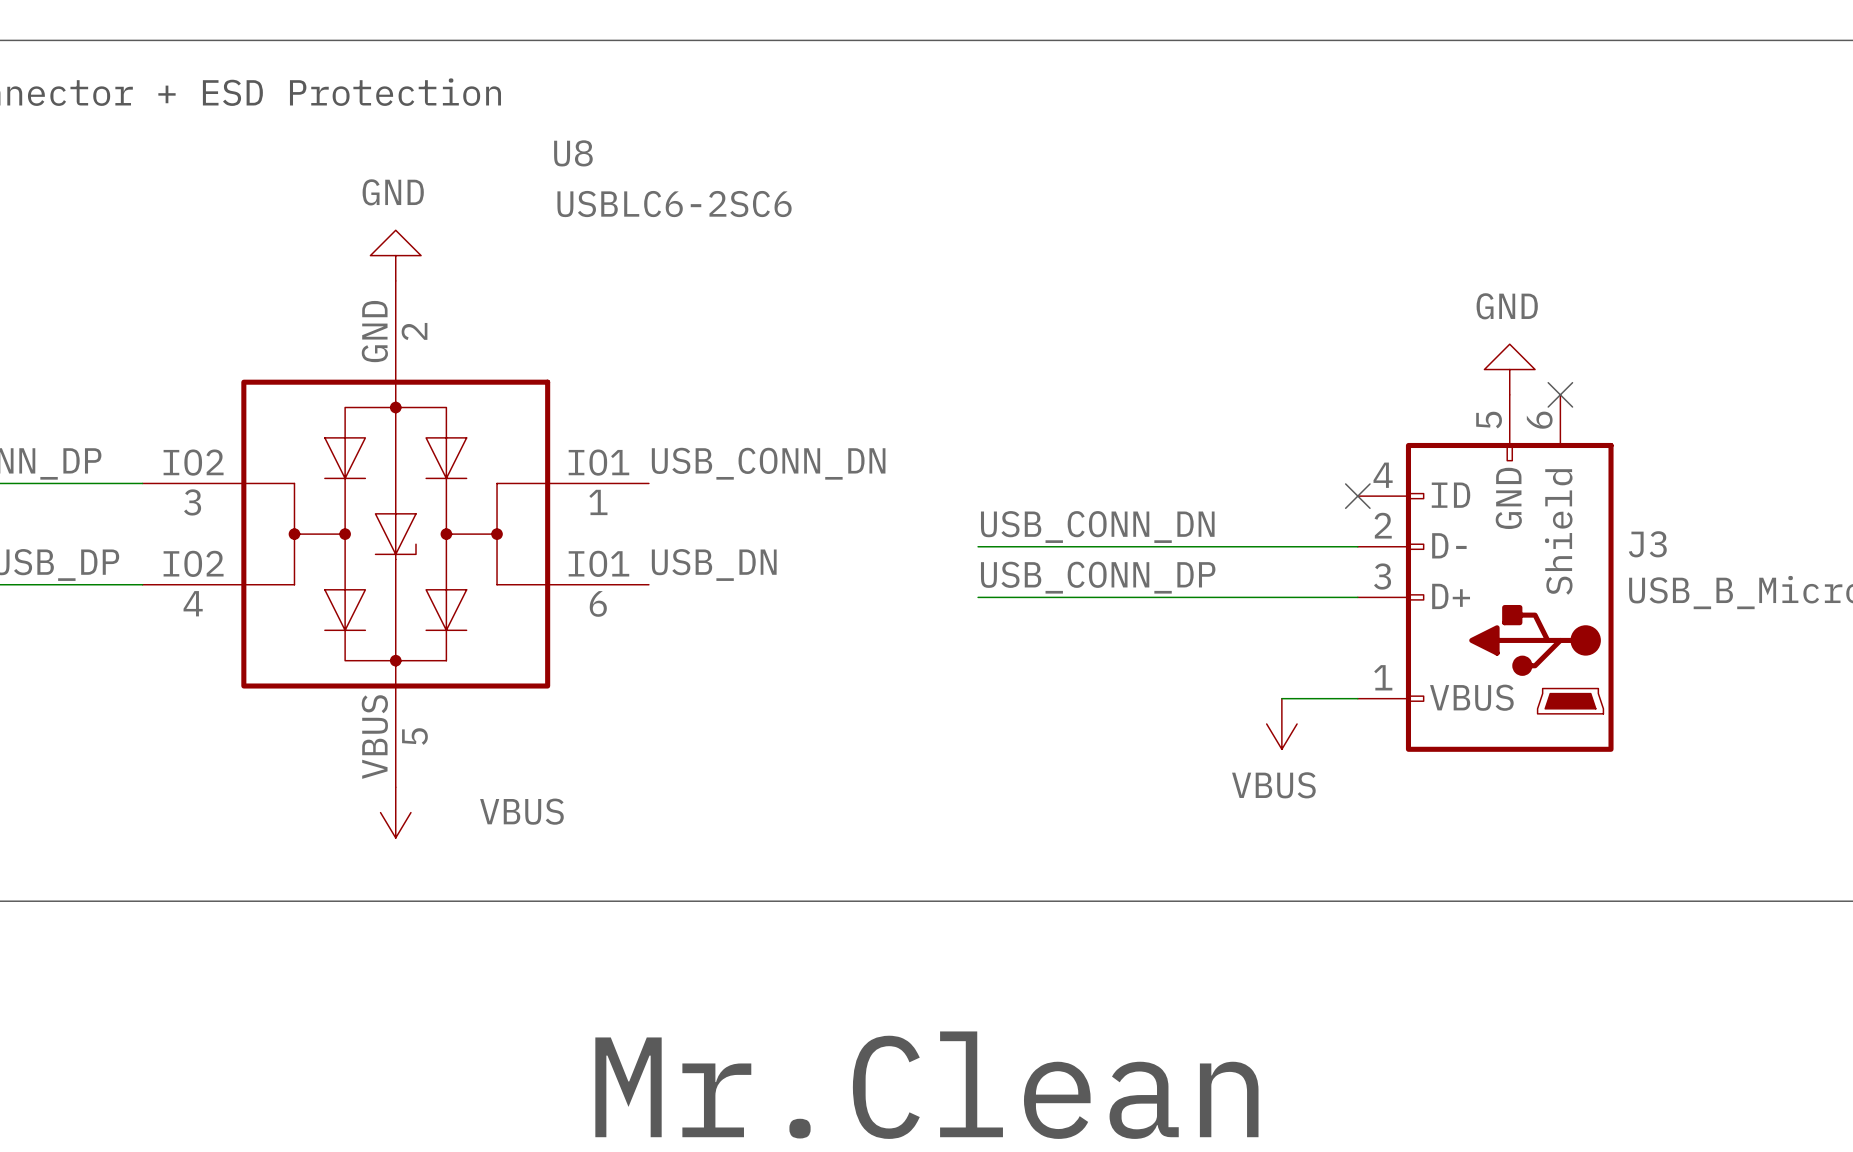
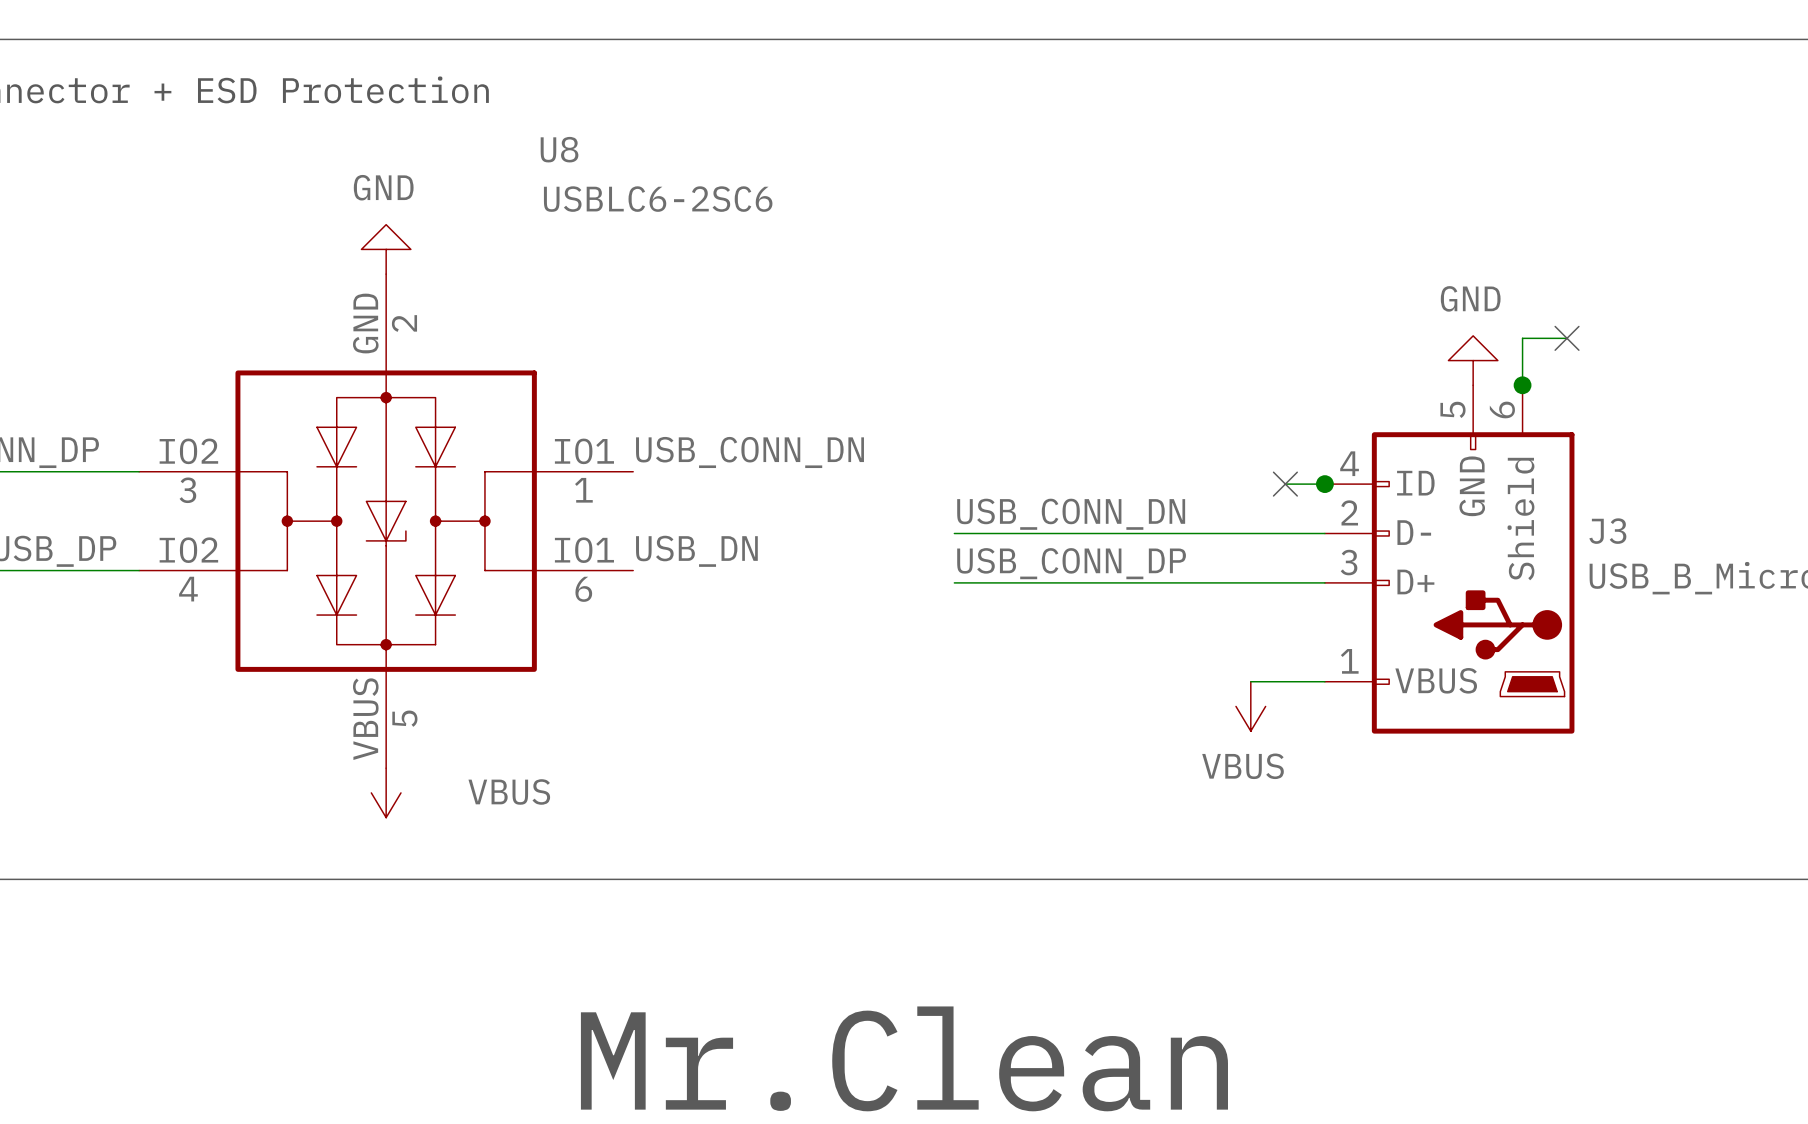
wire: none -> (1567, 338) (1522, 338) (1522, 387)
no-connect mark position: (1560, 394) -> (1567, 338)
junction: none -> (1522, 385)
wire: none -> (1285, 484) (1327, 484)
no-connect mark position: (1357, 496) -> (1285, 484)
junction: none -> (1324, 484)

